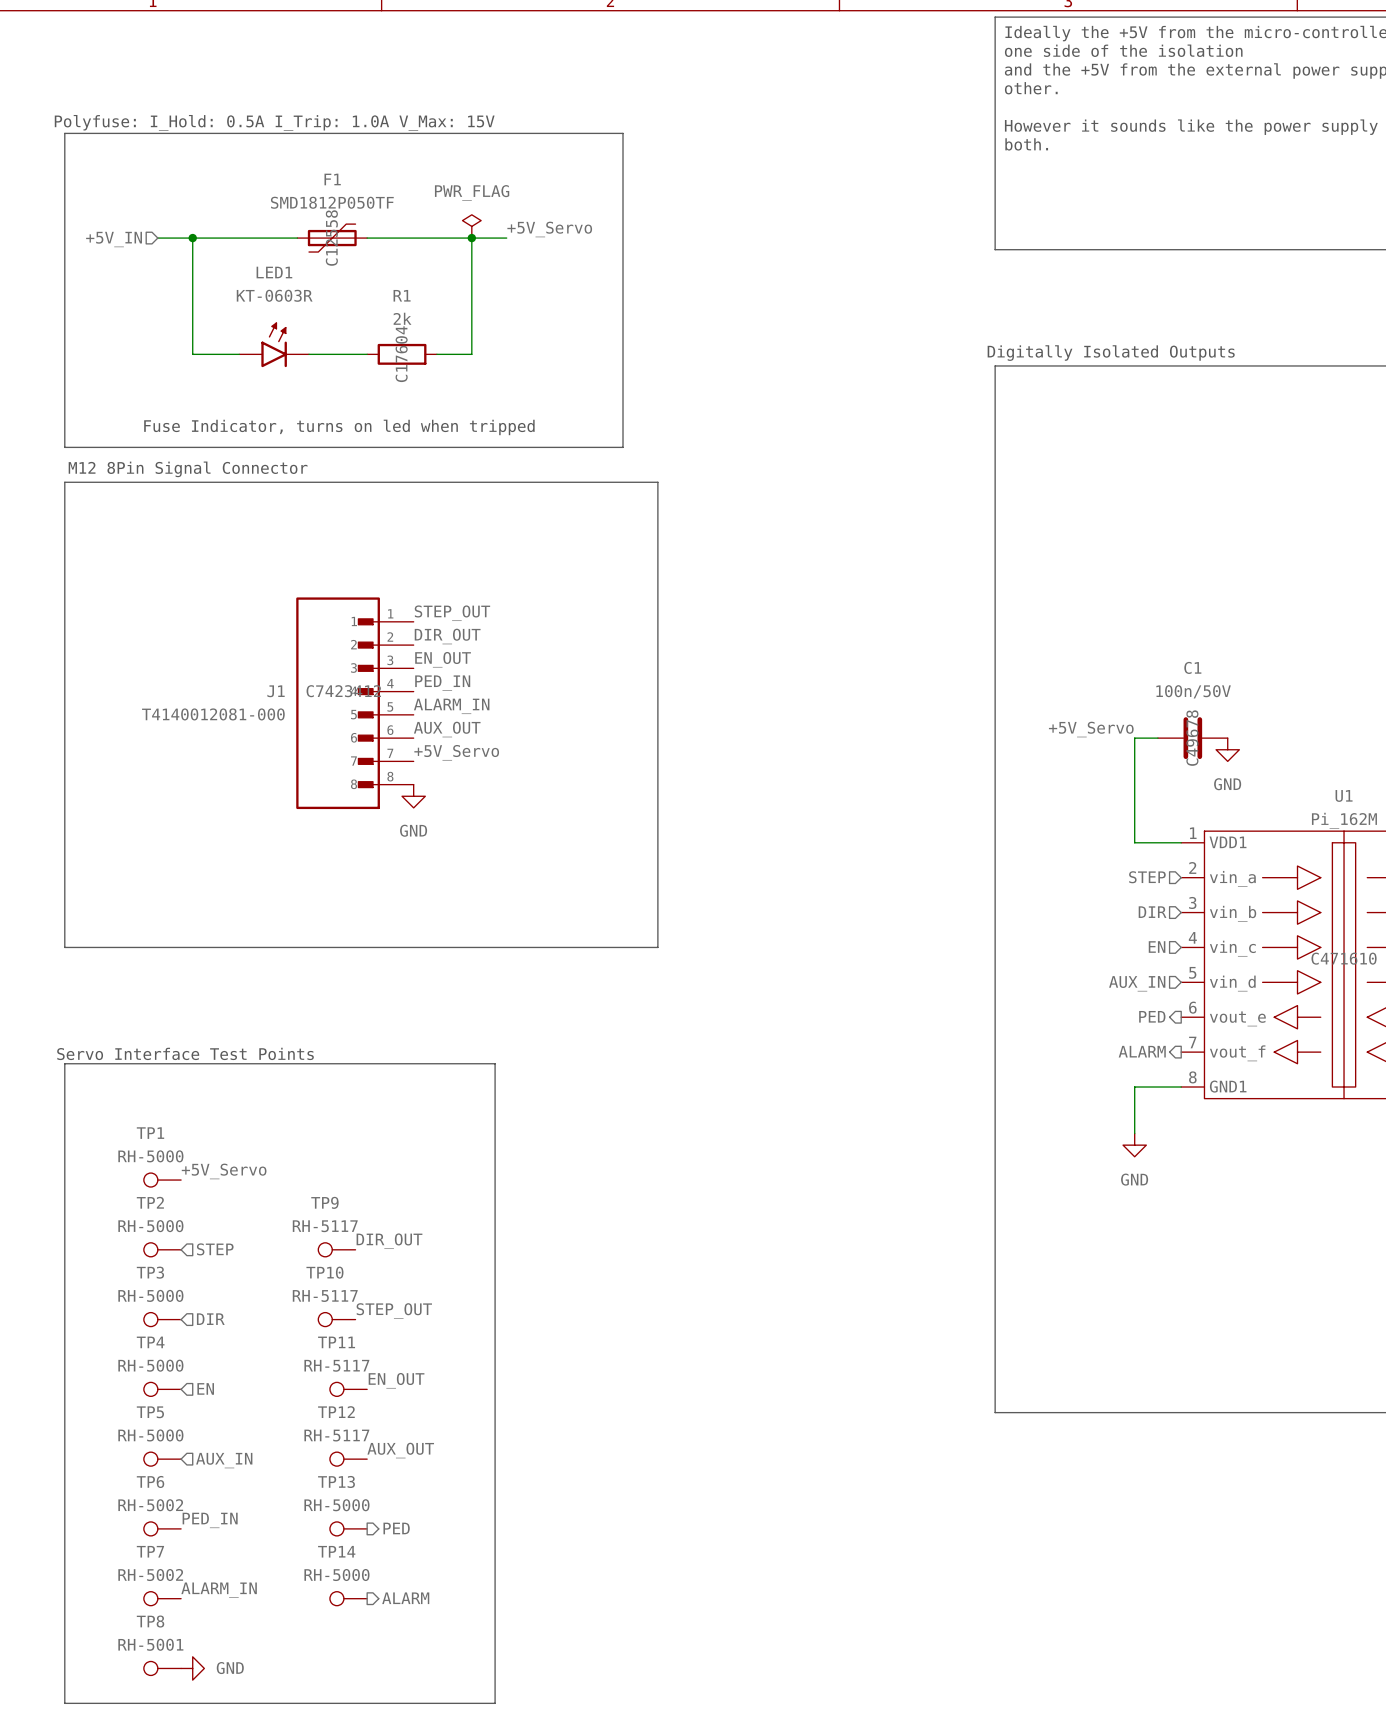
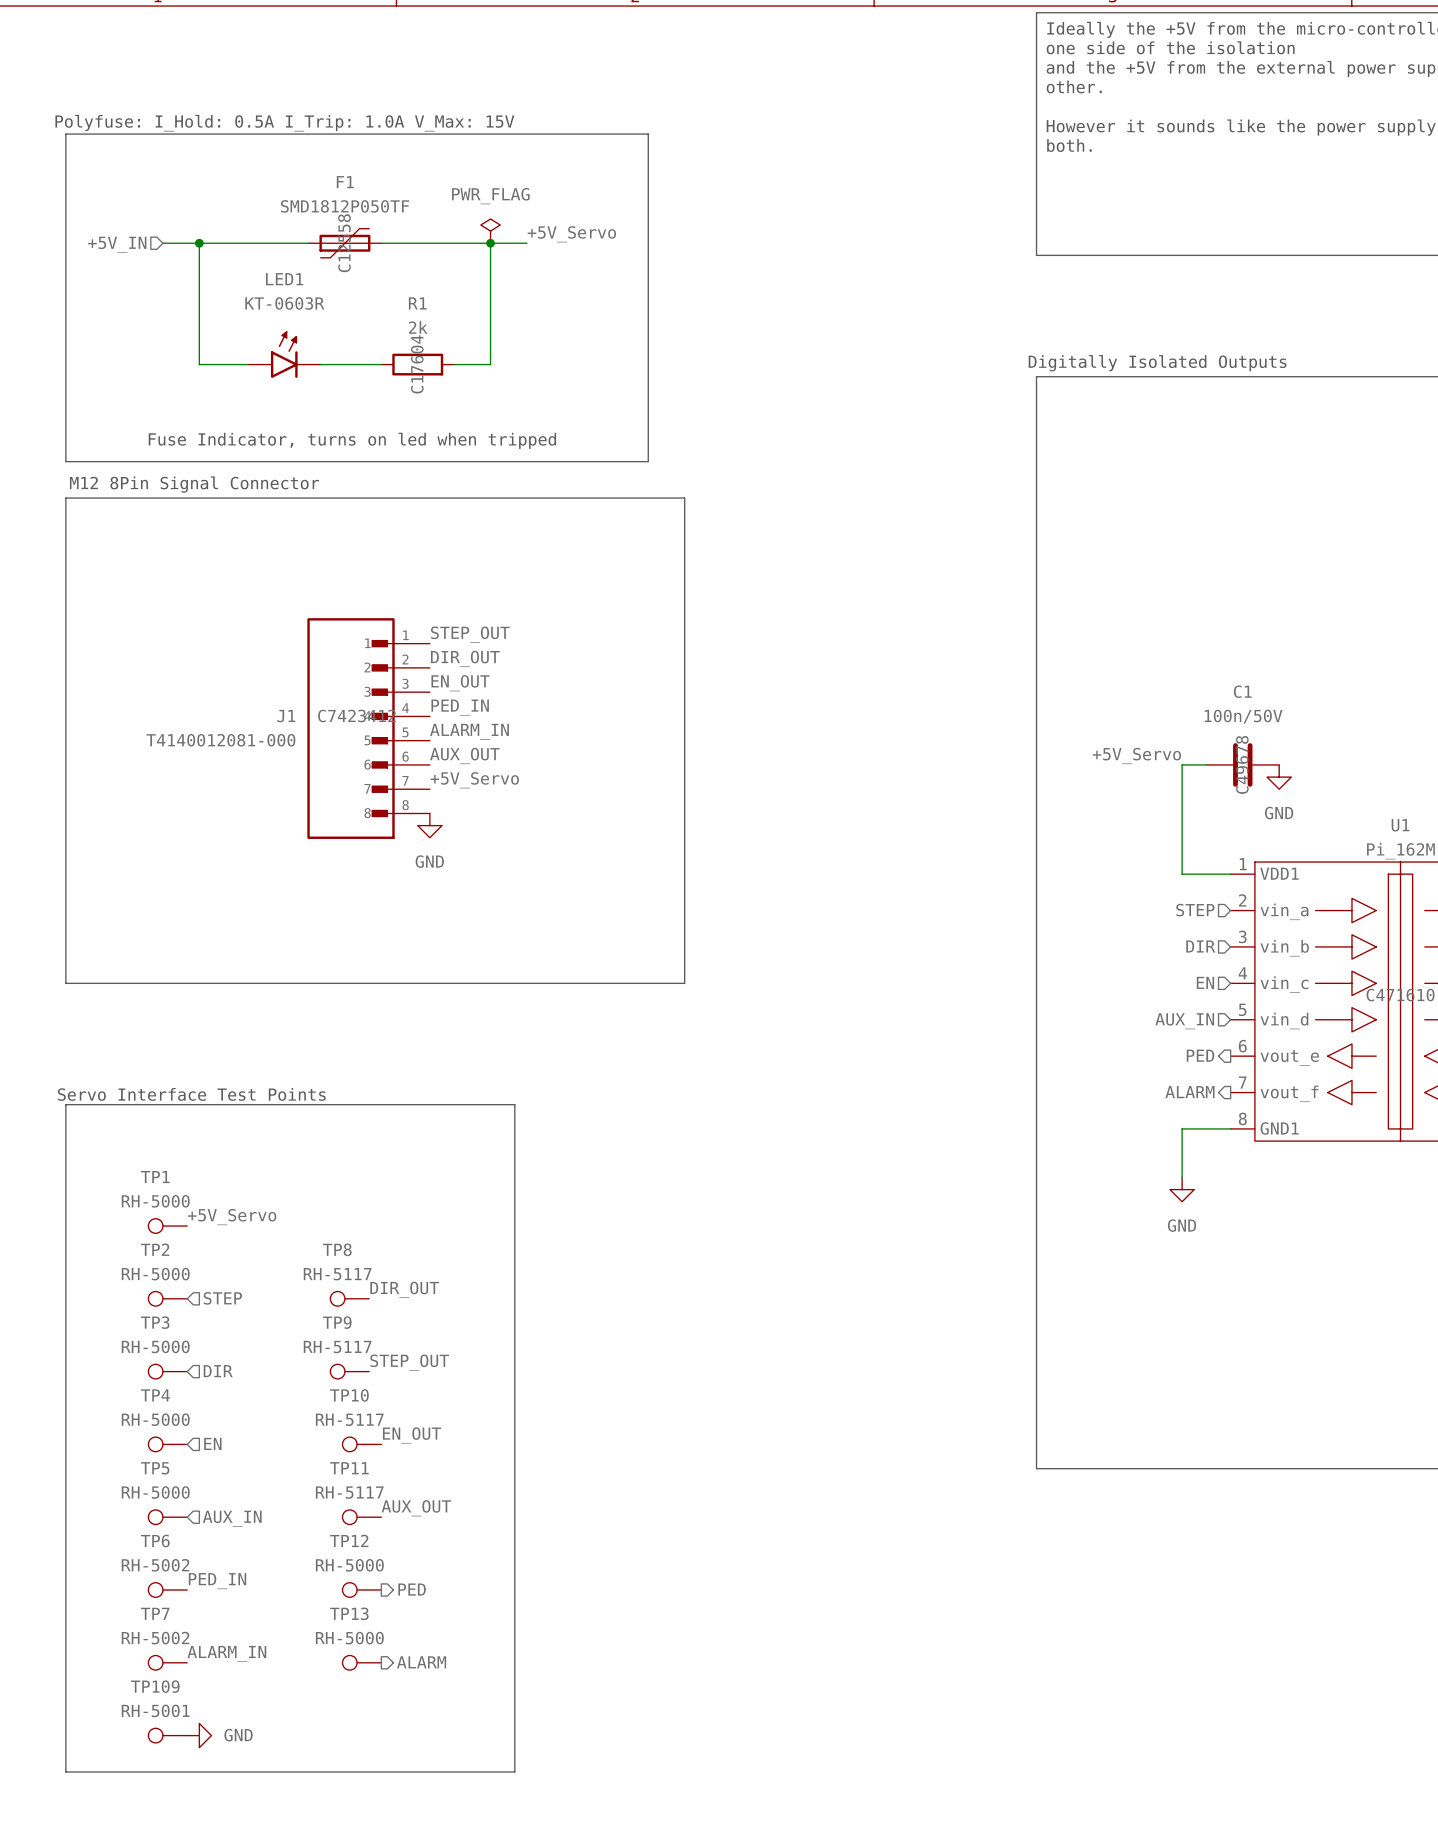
TP9 name: TP9 (324, 1202) -> TP8 (337, 1249)
TP10 name: TP10 (324, 1272) -> TP9 (337, 1322)
TP11 name: TP11 (336, 1342) -> TP10 (349, 1395)
TP12 name: TP12 (336, 1412) -> TP11 (349, 1468)
TP13 name: TP13 (336, 1481) -> TP12 (349, 1540)
TP14 name: TP14 (336, 1551) -> TP13 (349, 1613)
TP8 name: TP8 (150, 1621) -> TP109 (155, 1686)

